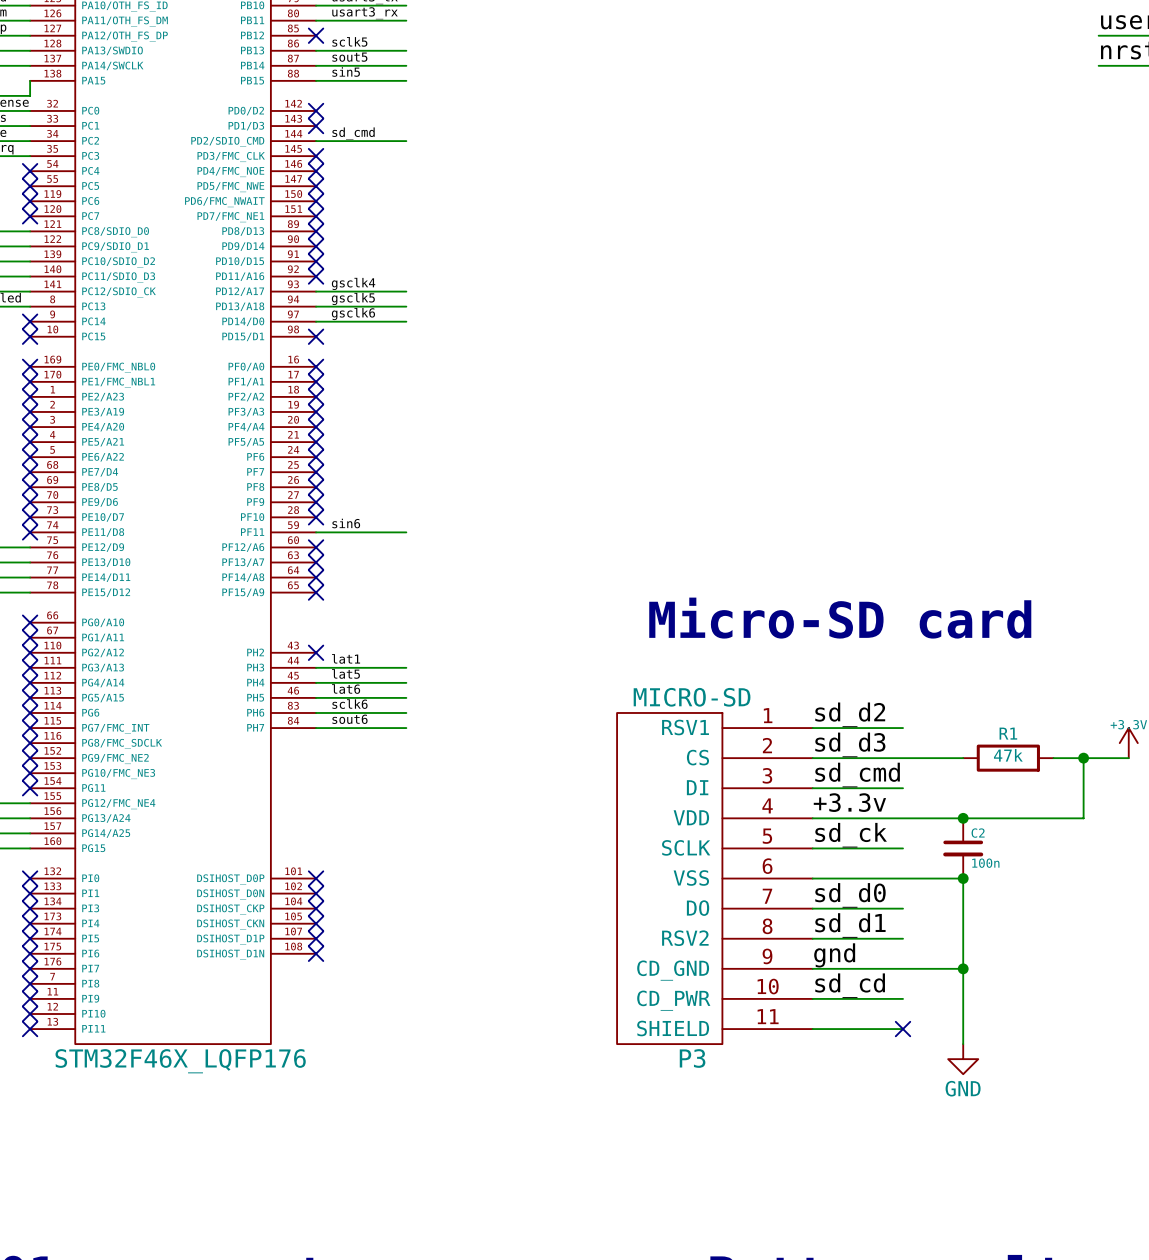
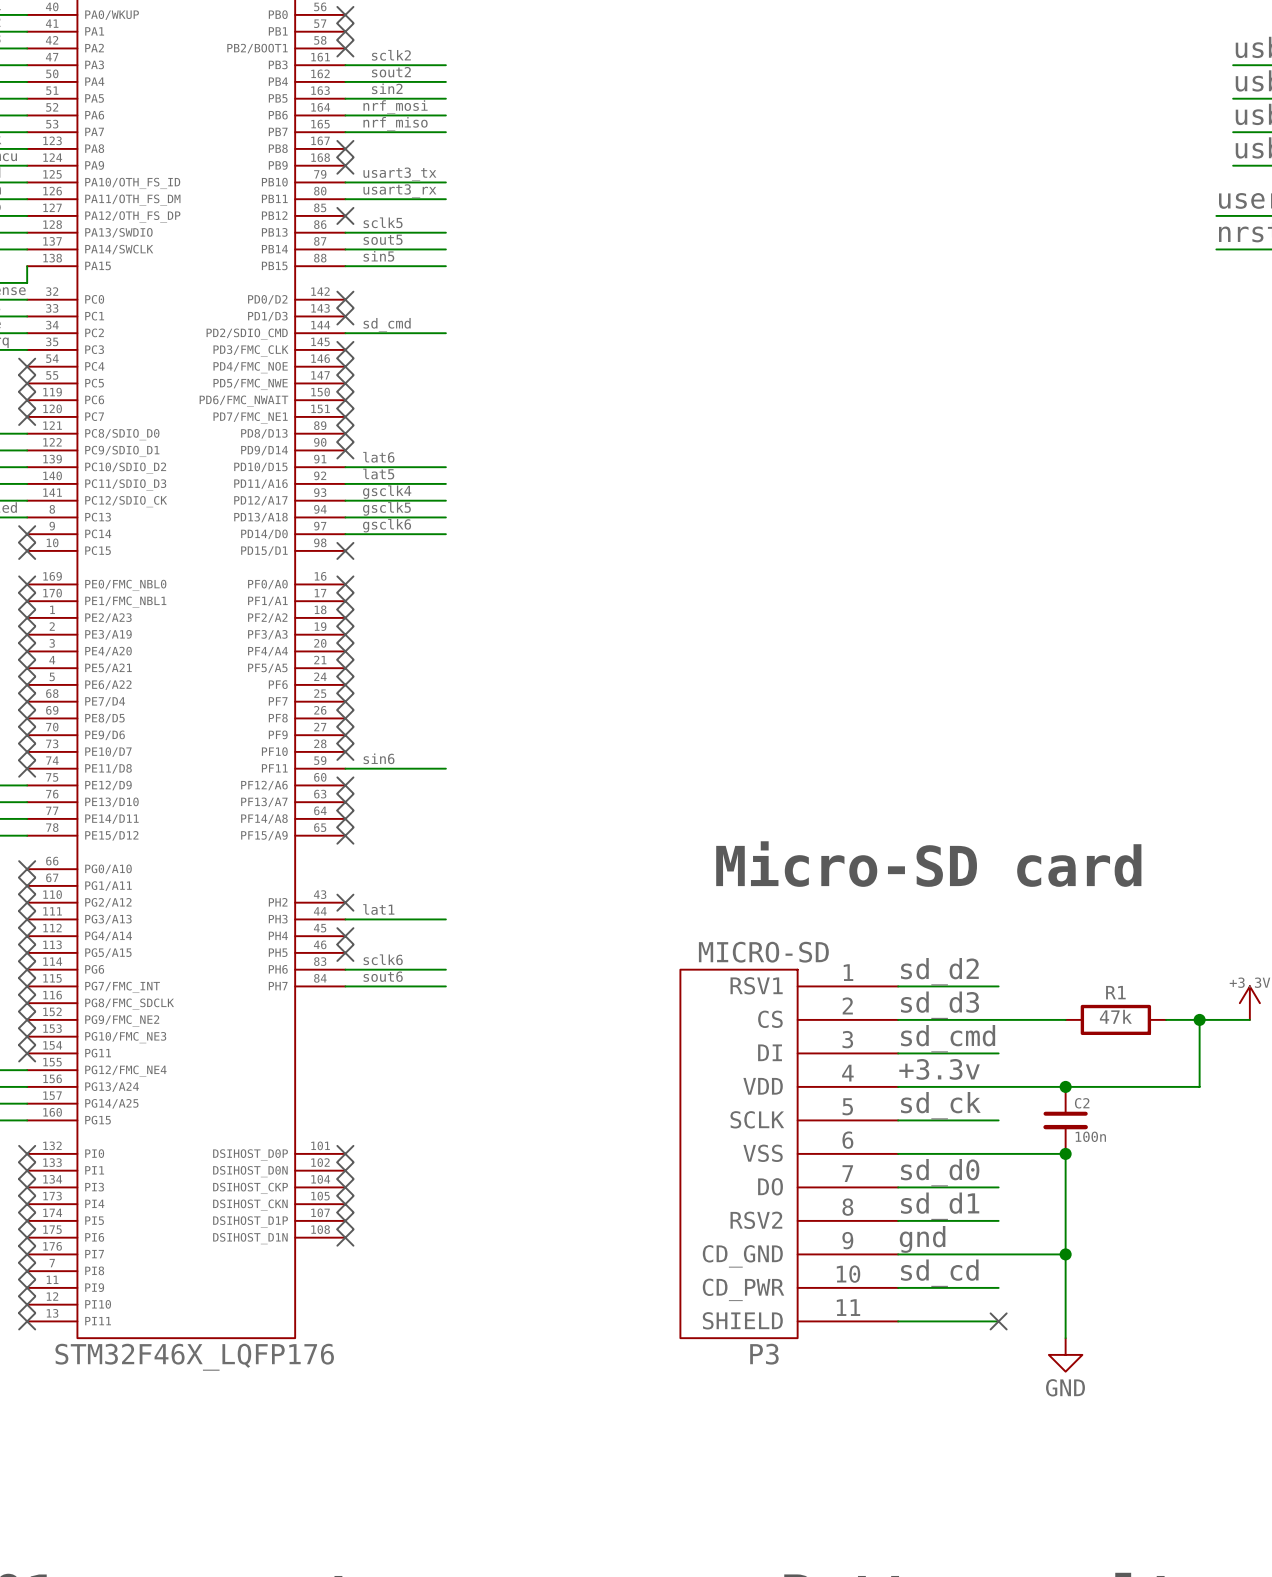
label: none -> lat6 (378, 457)
wire: none -> (345, 467) (445, 467)
no-connect mark: (316, 261) -> none
label: none -> lat5 (378, 474)
wire: none -> (345, 483) (445, 483)
no-connect mark: (316, 276) -> none
label: lat5 (346, 673) -> none
wire: (316, 682) (406, 682) -> none
no-connect mark: none -> (345, 936)
label: lat6 (346, 689) -> none
wire: (316, 697) (406, 697) -> none
no-connect mark: none -> (345, 952)

